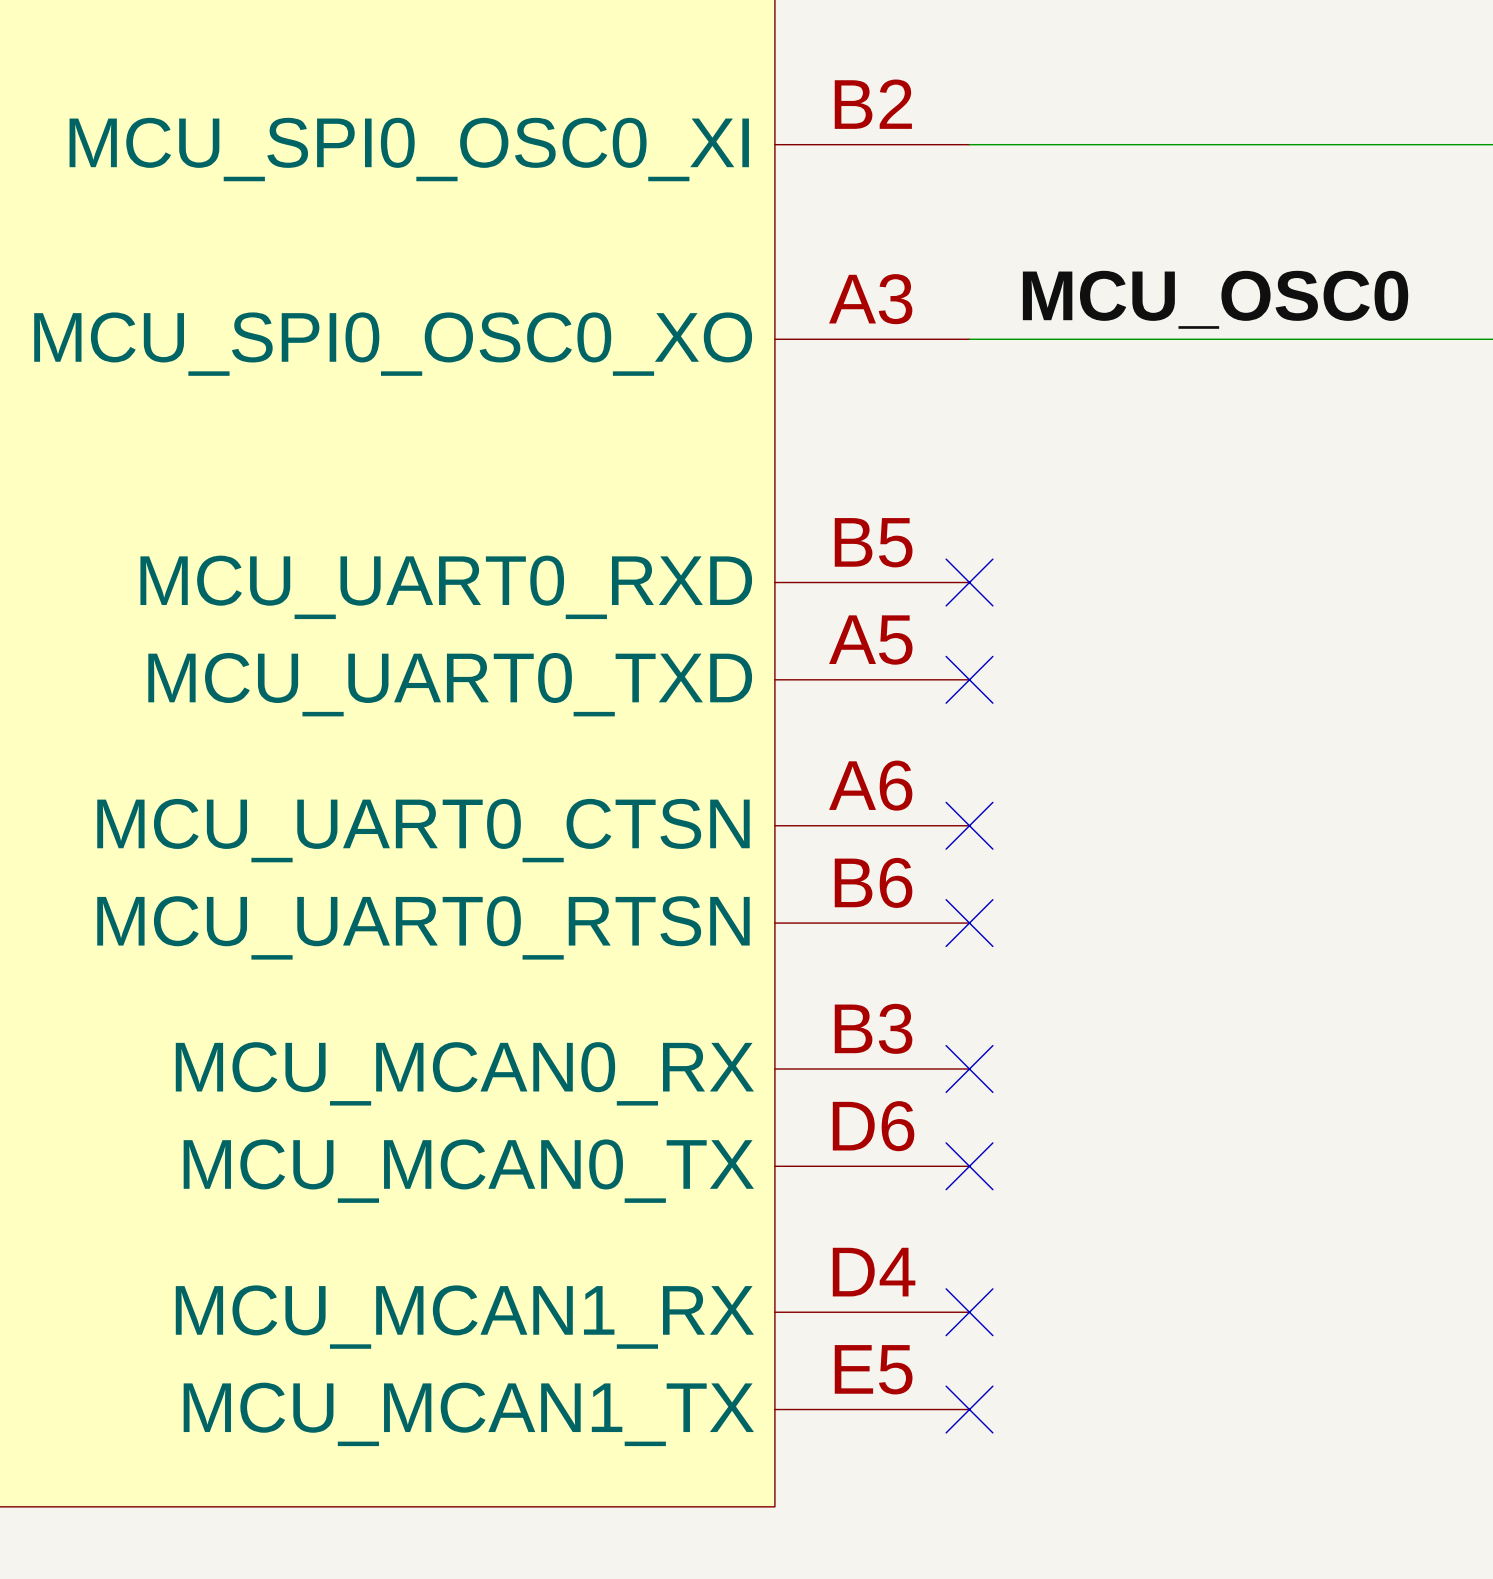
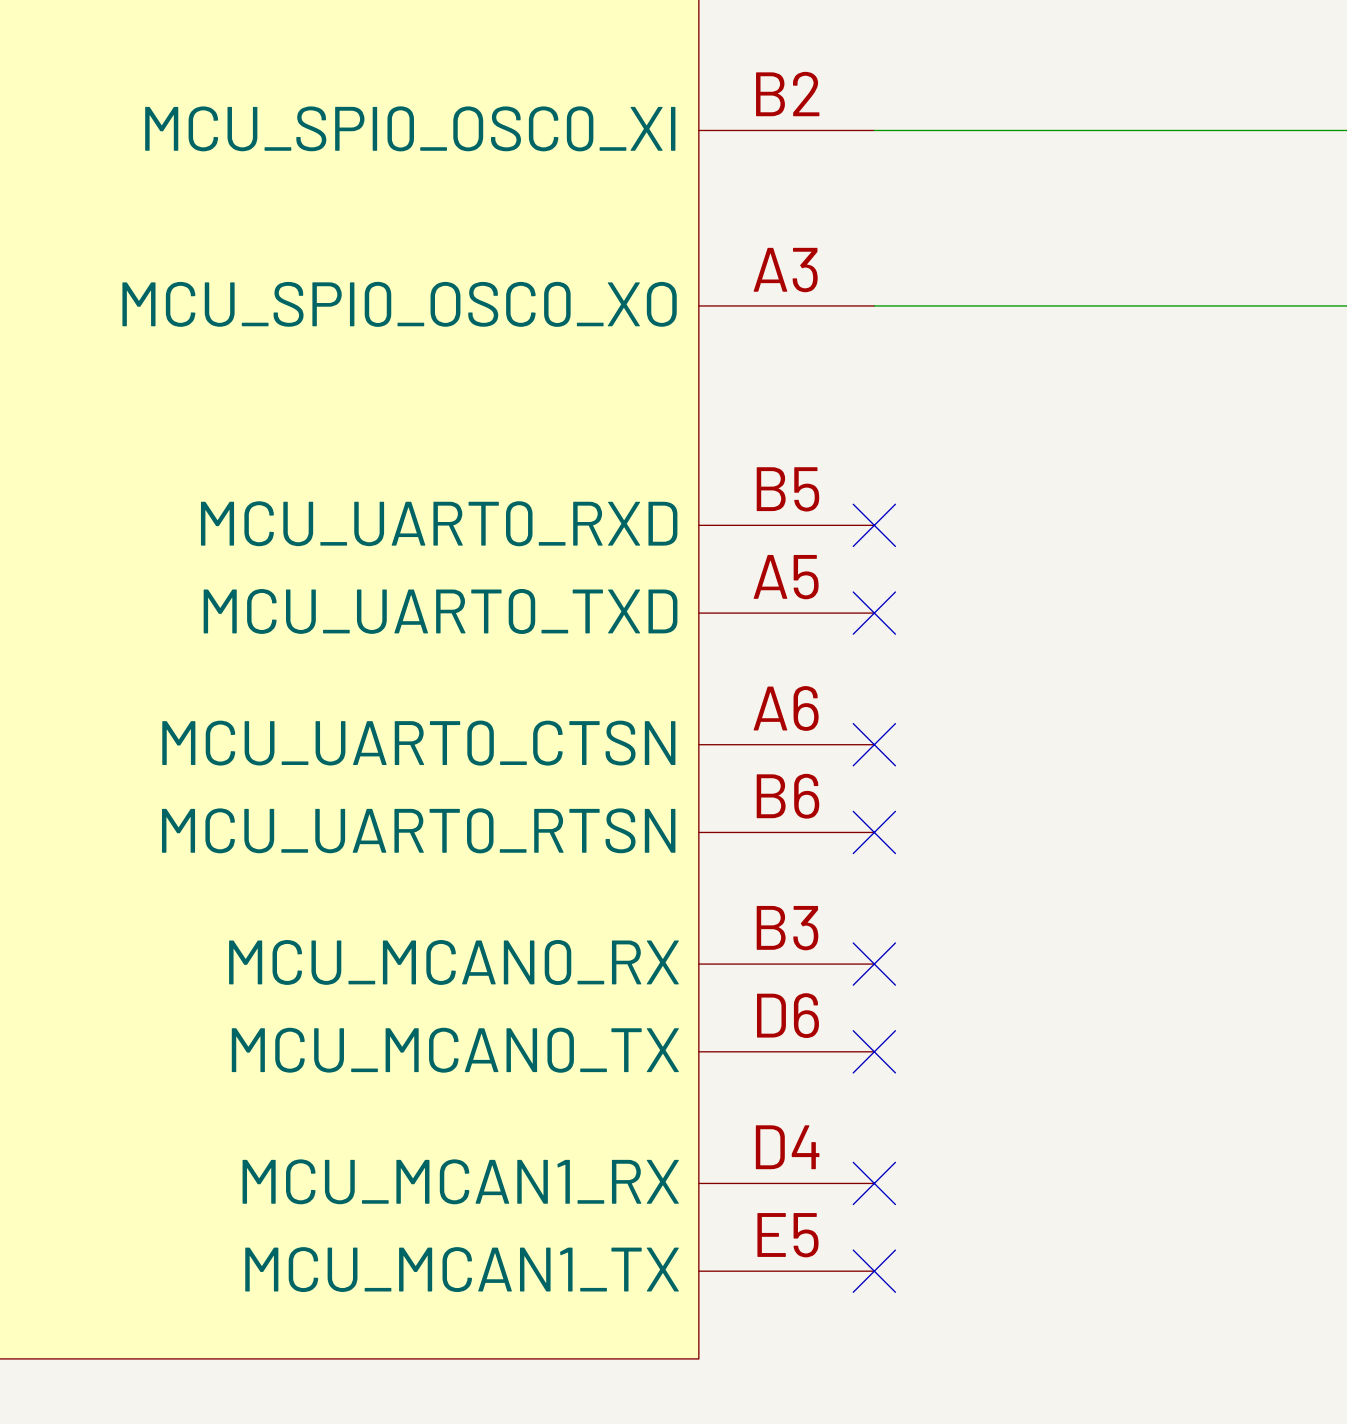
label: MCU_OSC0 (1215, 299) -> none

